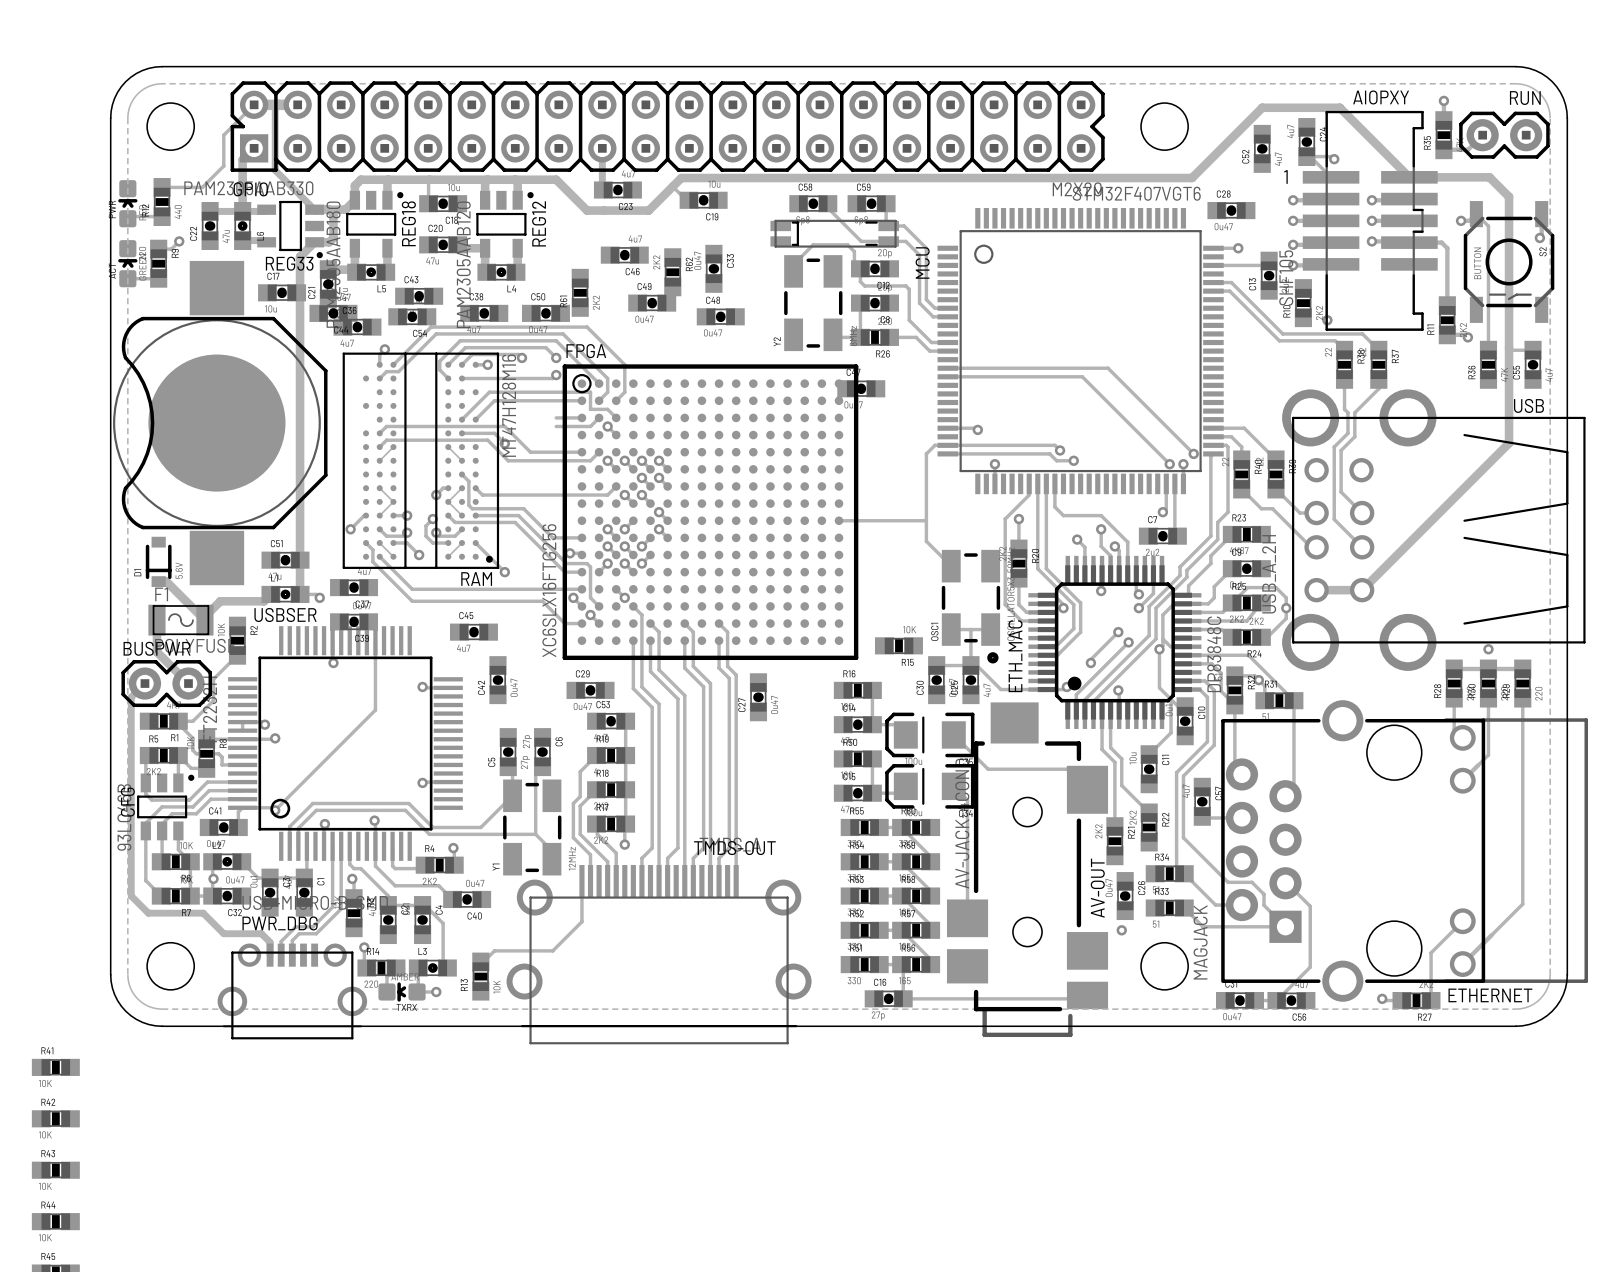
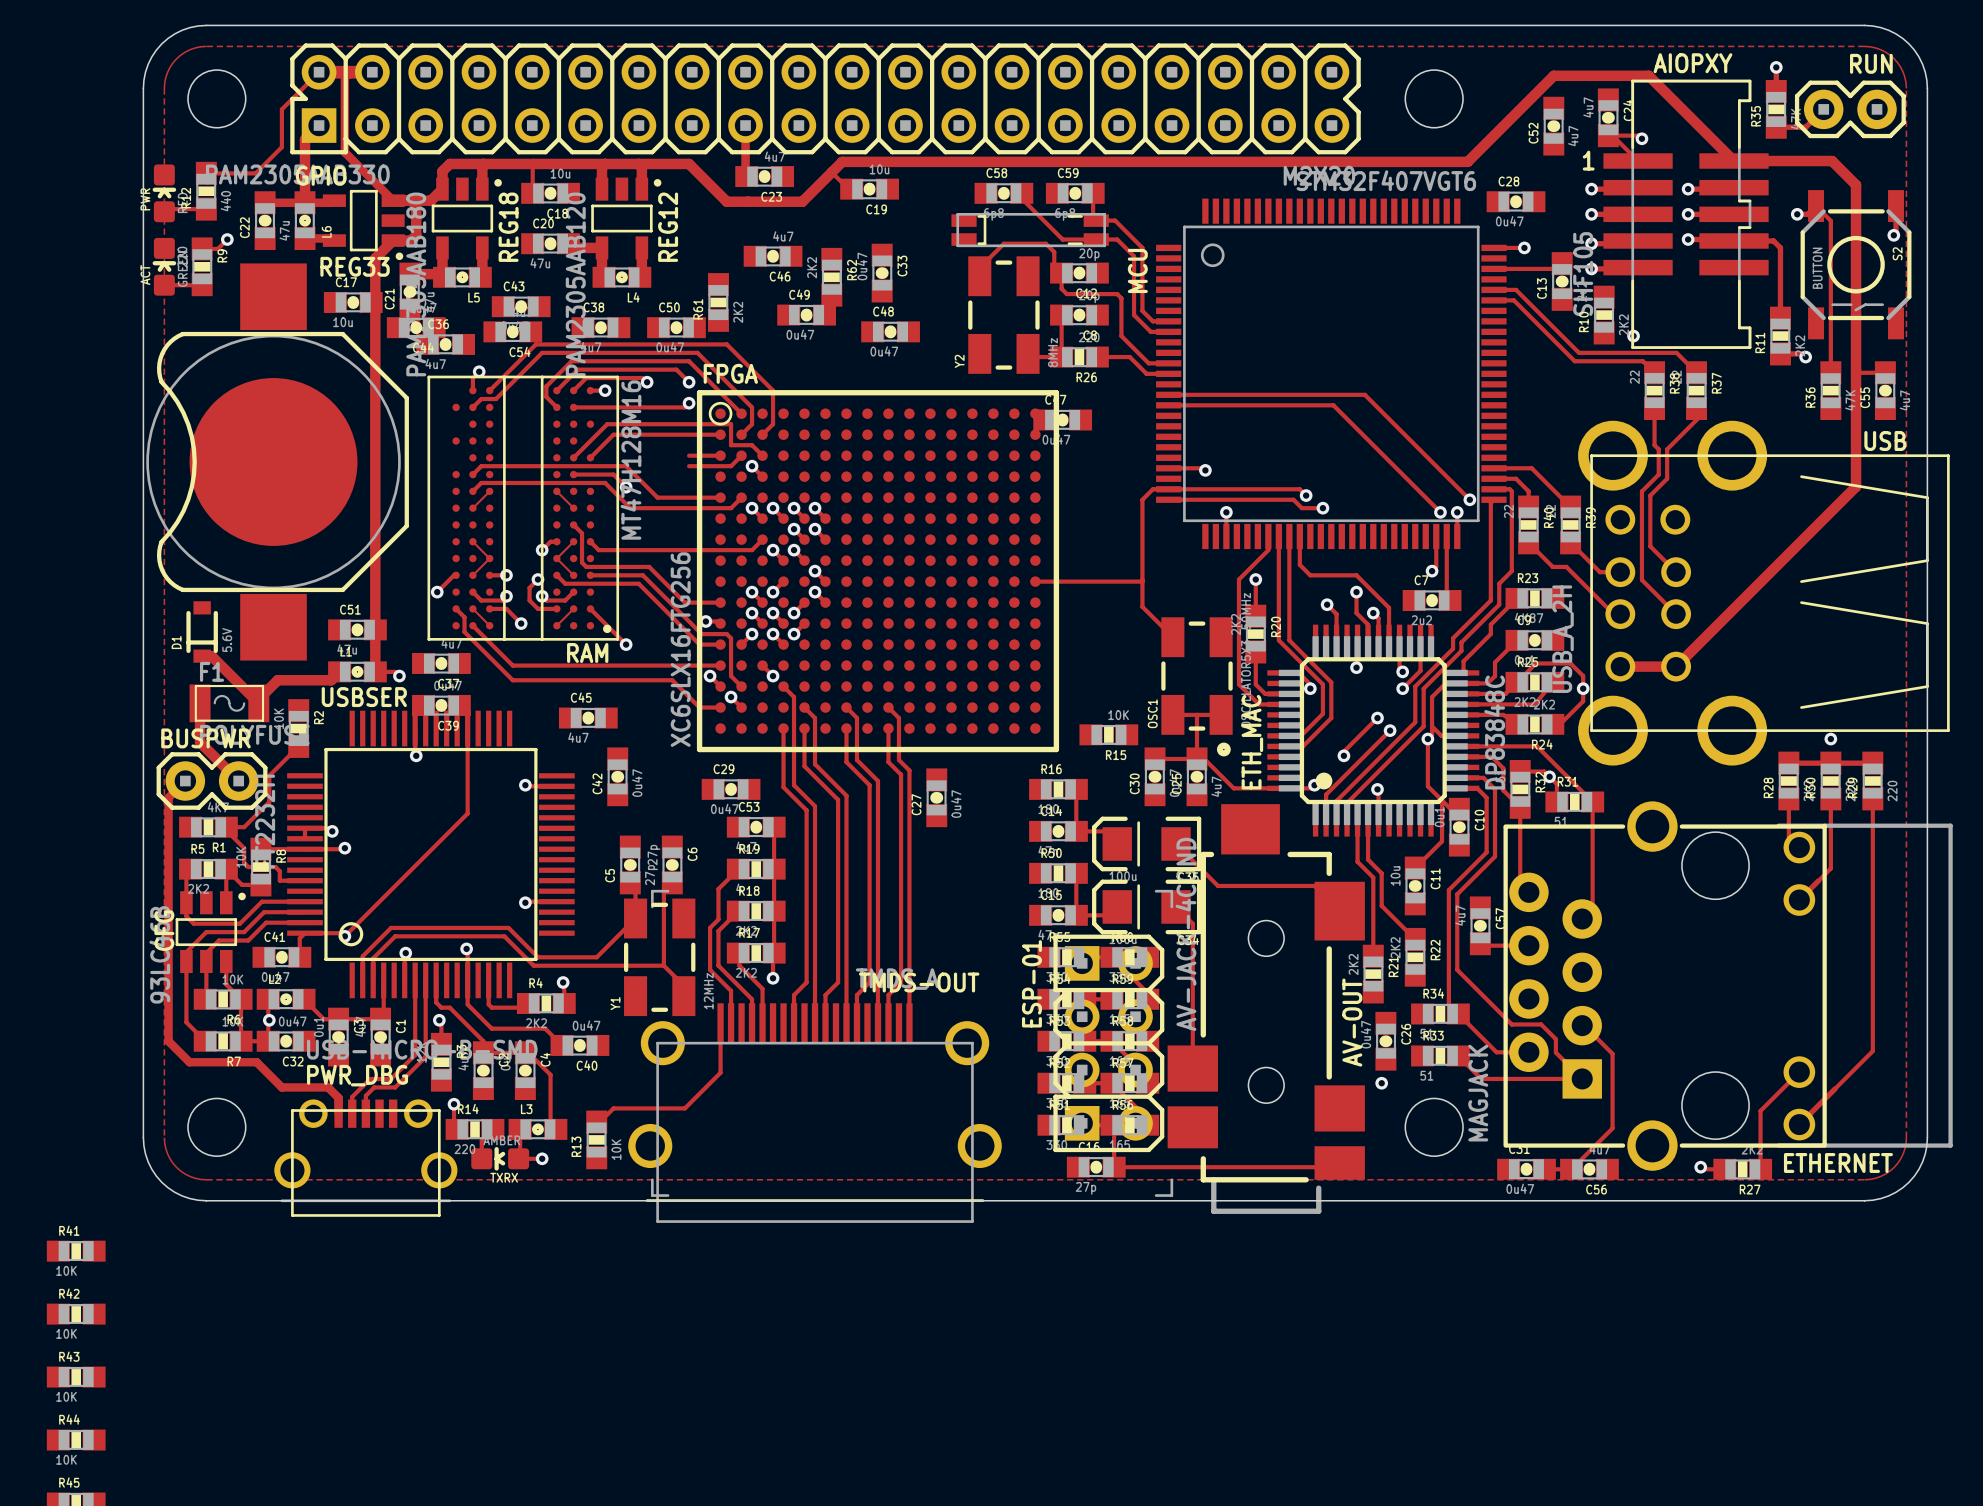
ESP-01: none -> (912, 1043)

